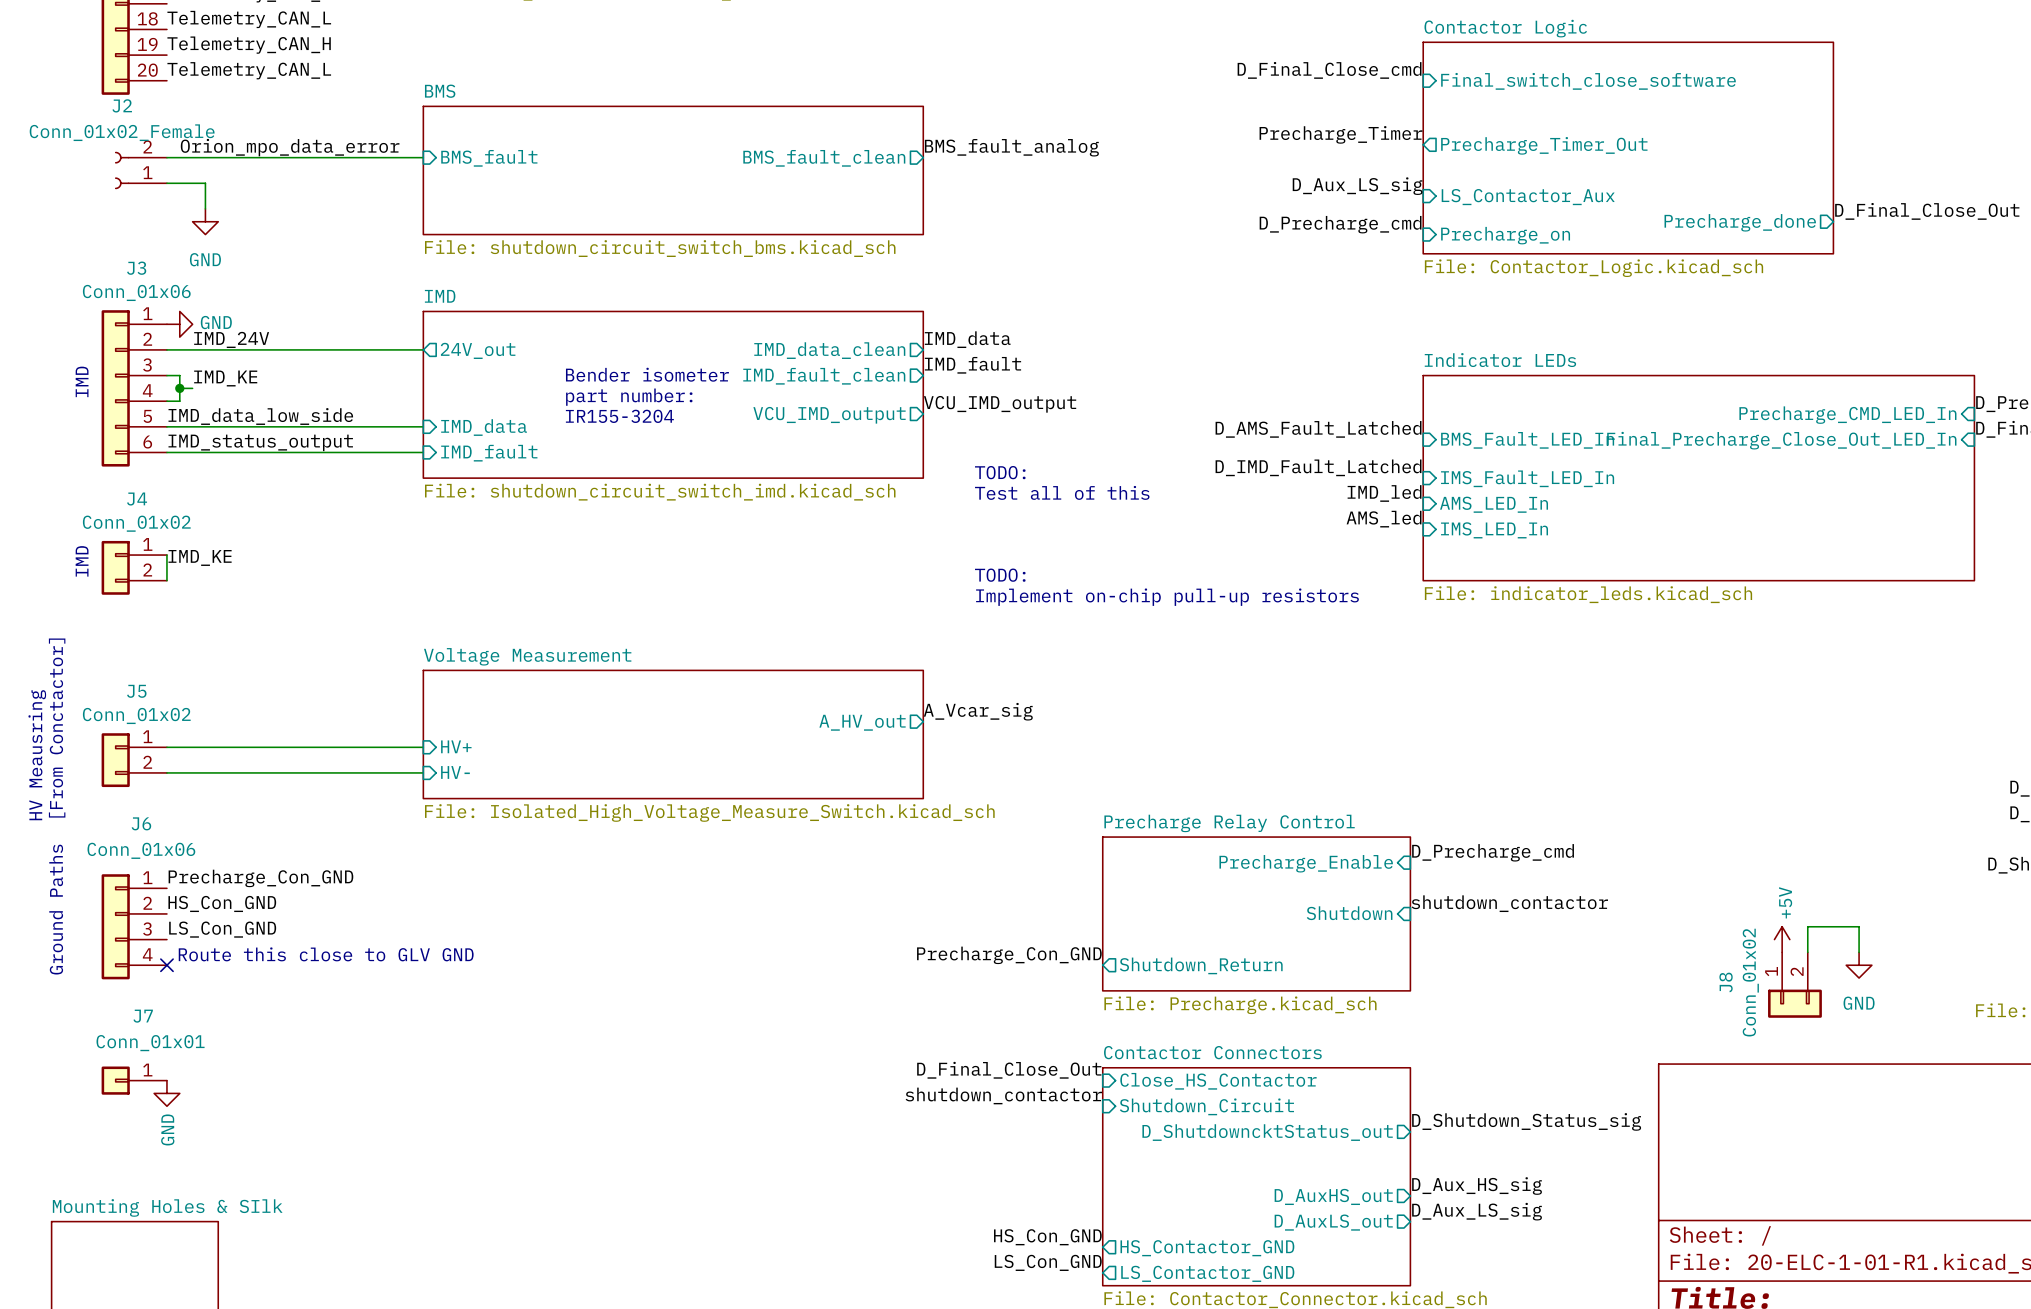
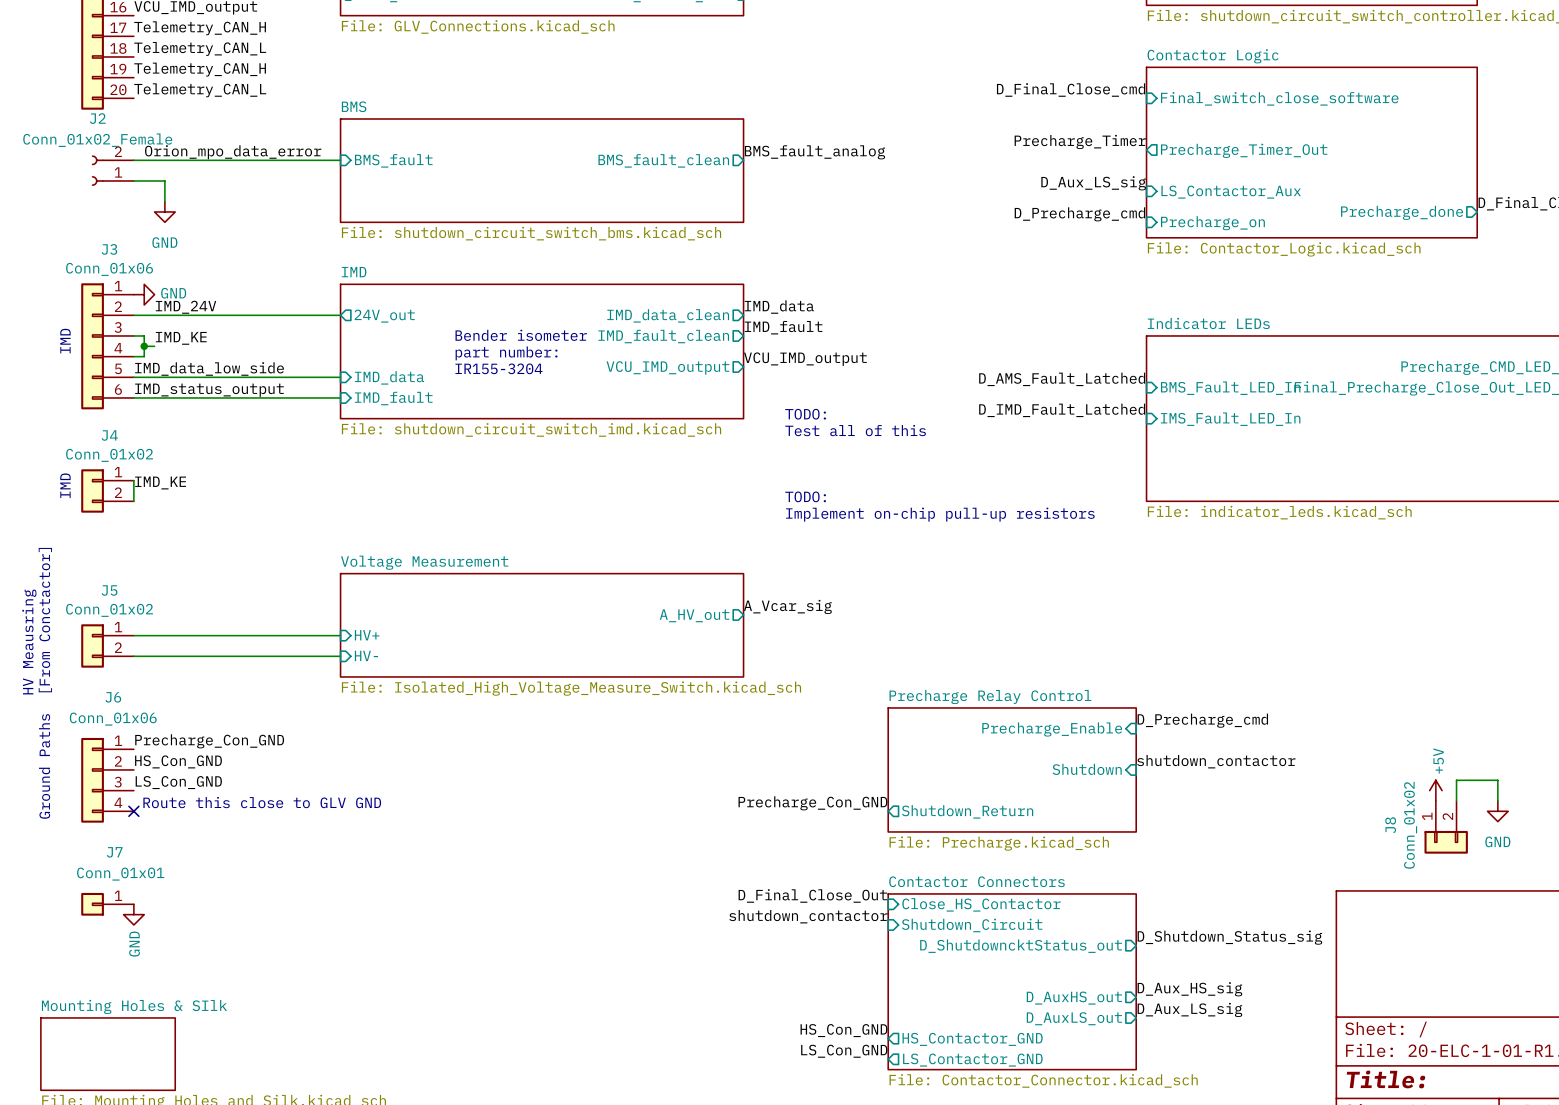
label: IMD_led (1384, 493) -> none
sheet pin: AMS_LED_In (1494, 504) -> none
label: AMS_led (1384, 519) -> none
sheet pin: IMS_LED_In (1494, 530) -> none

